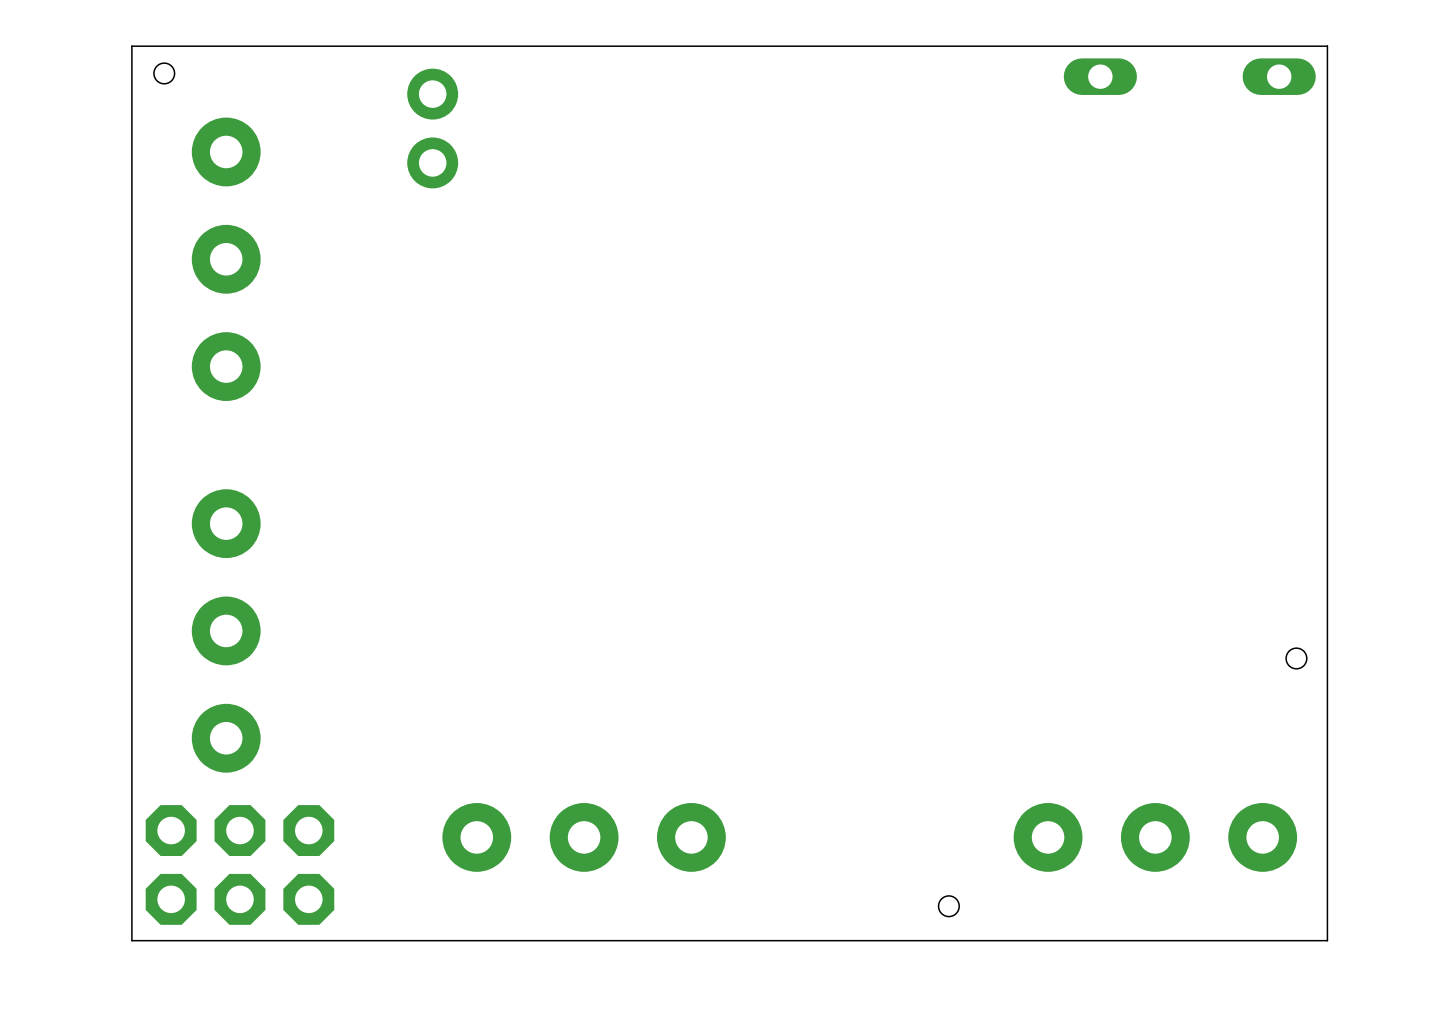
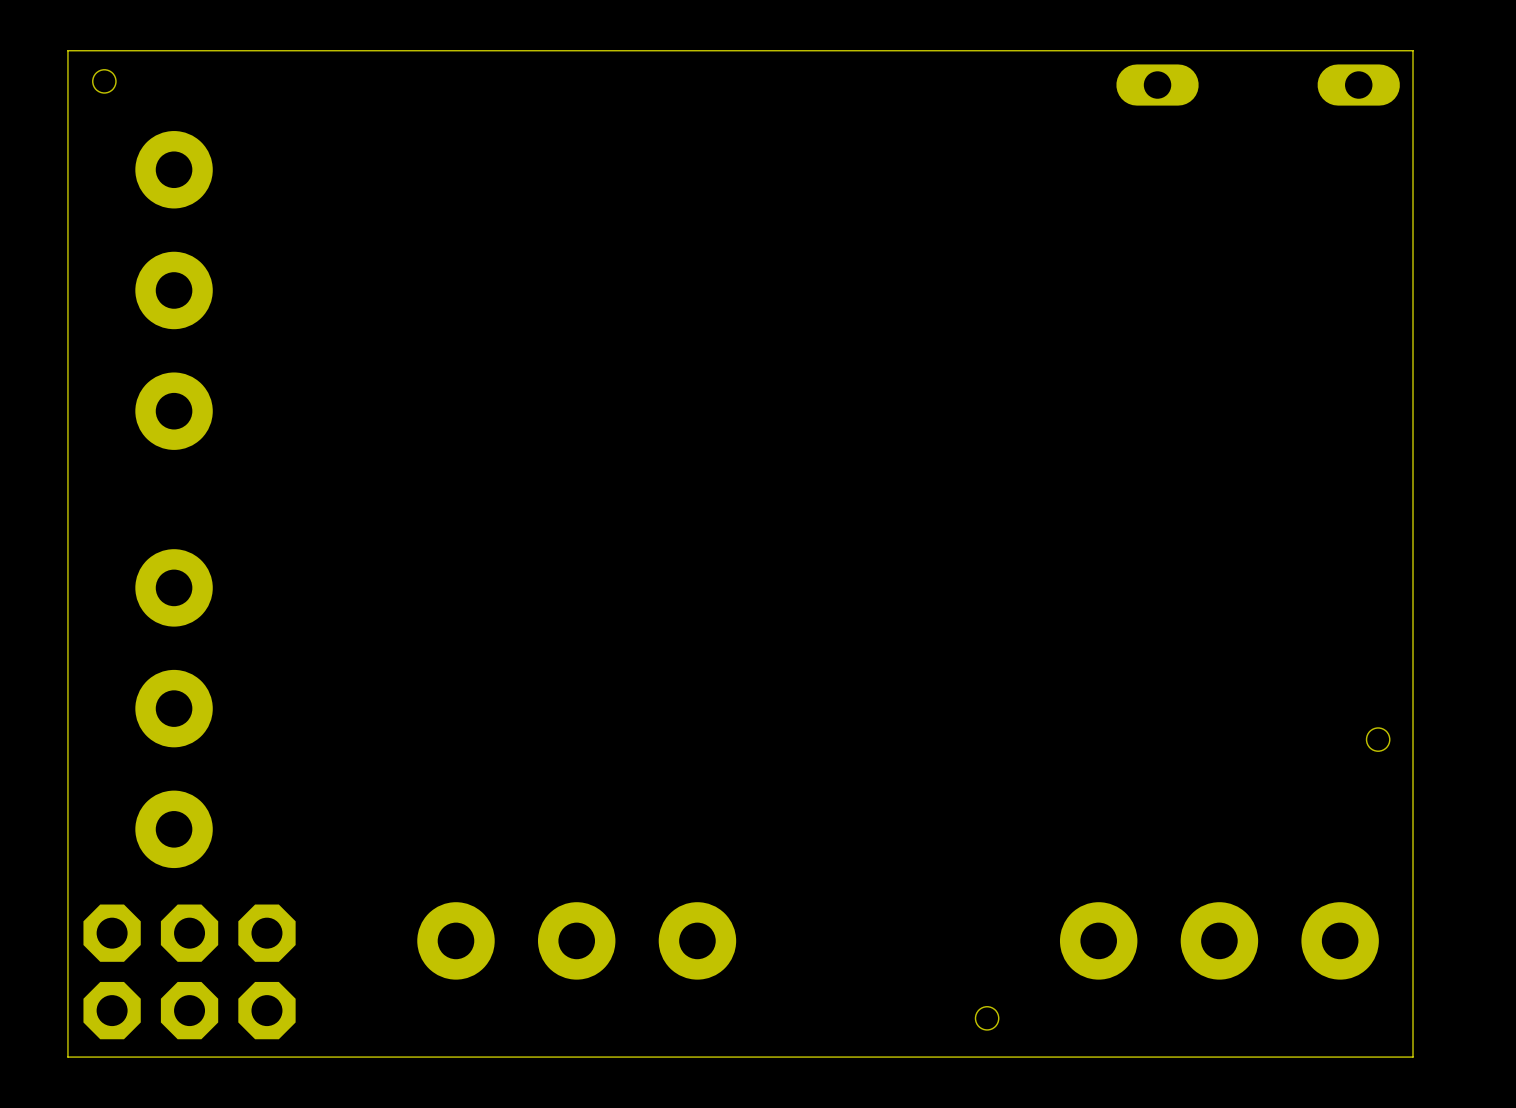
part: (432, 128) -> none

